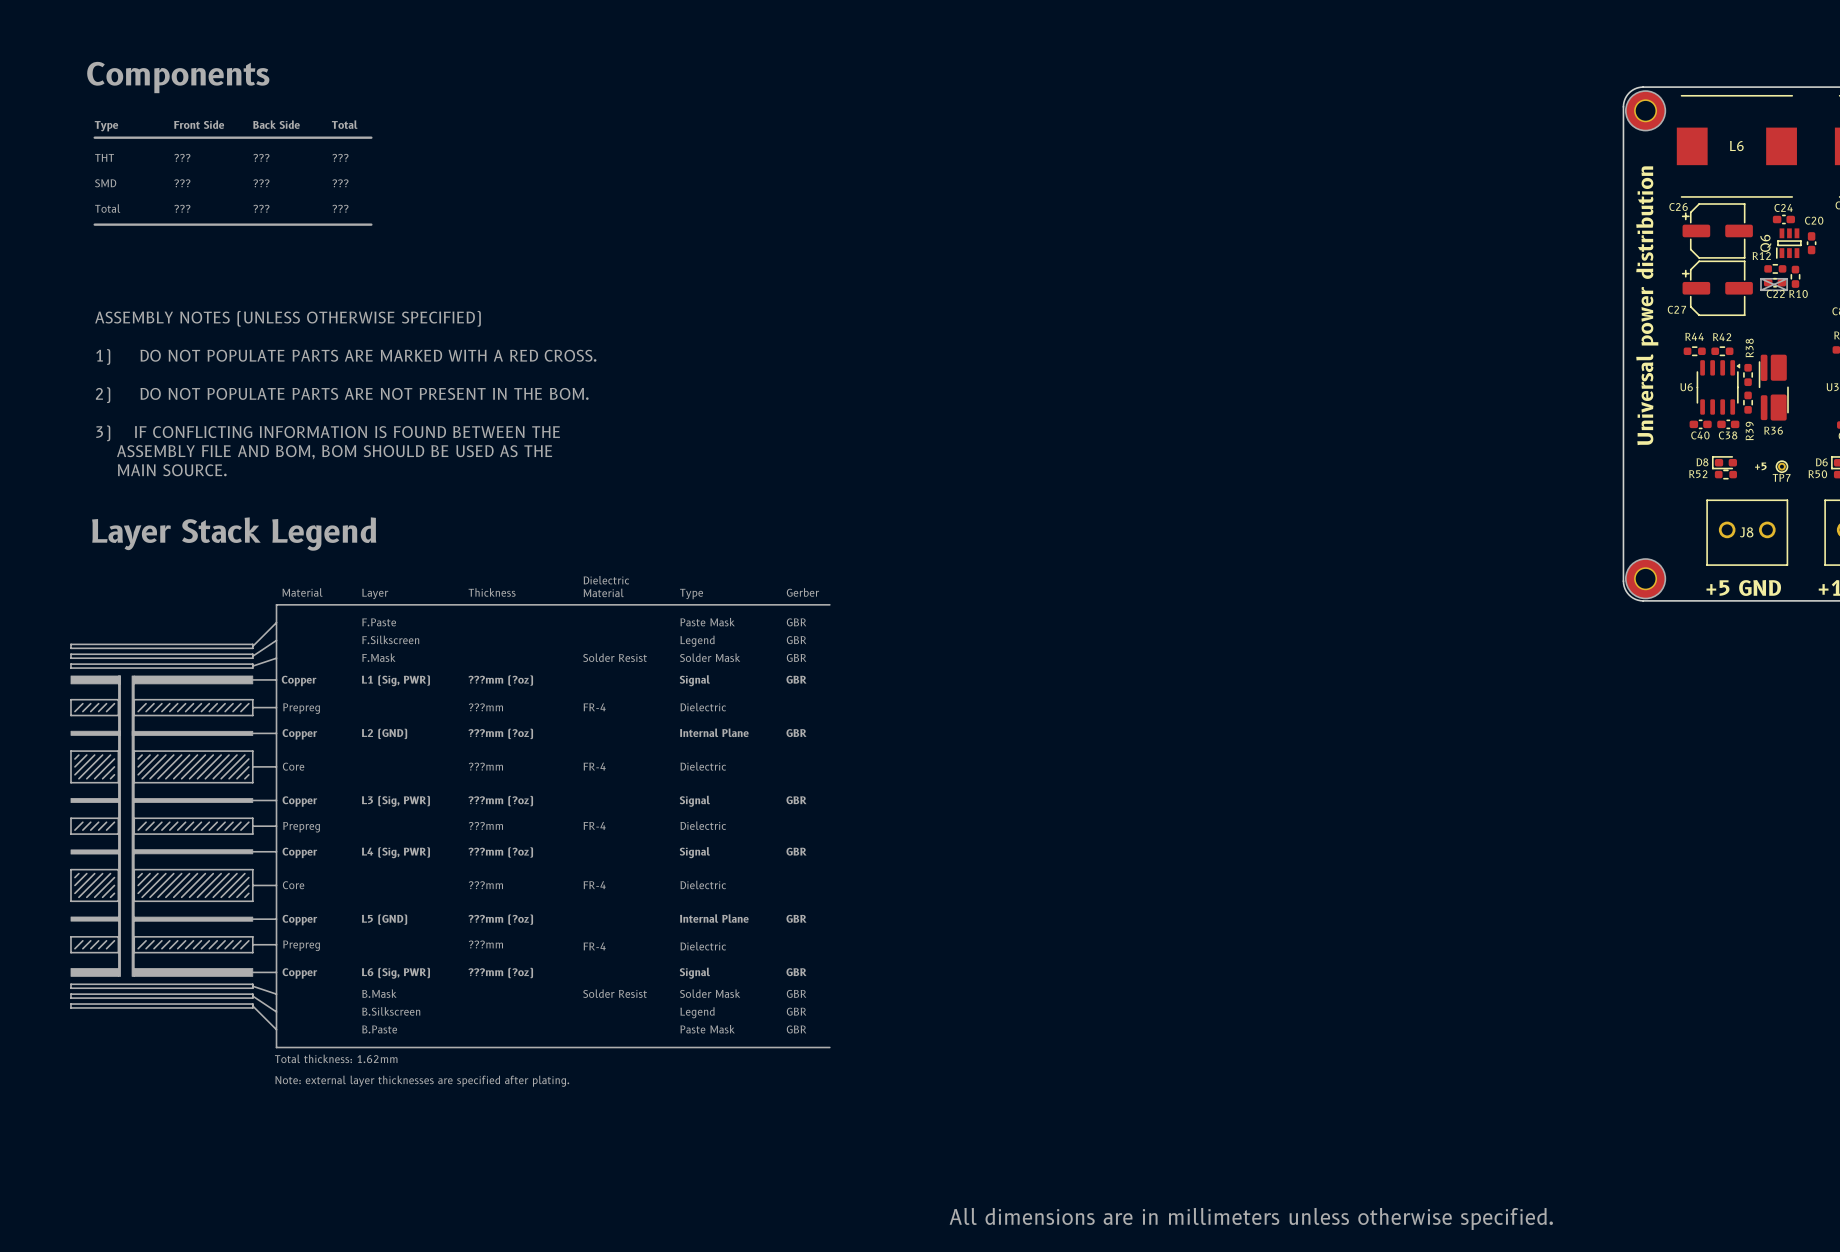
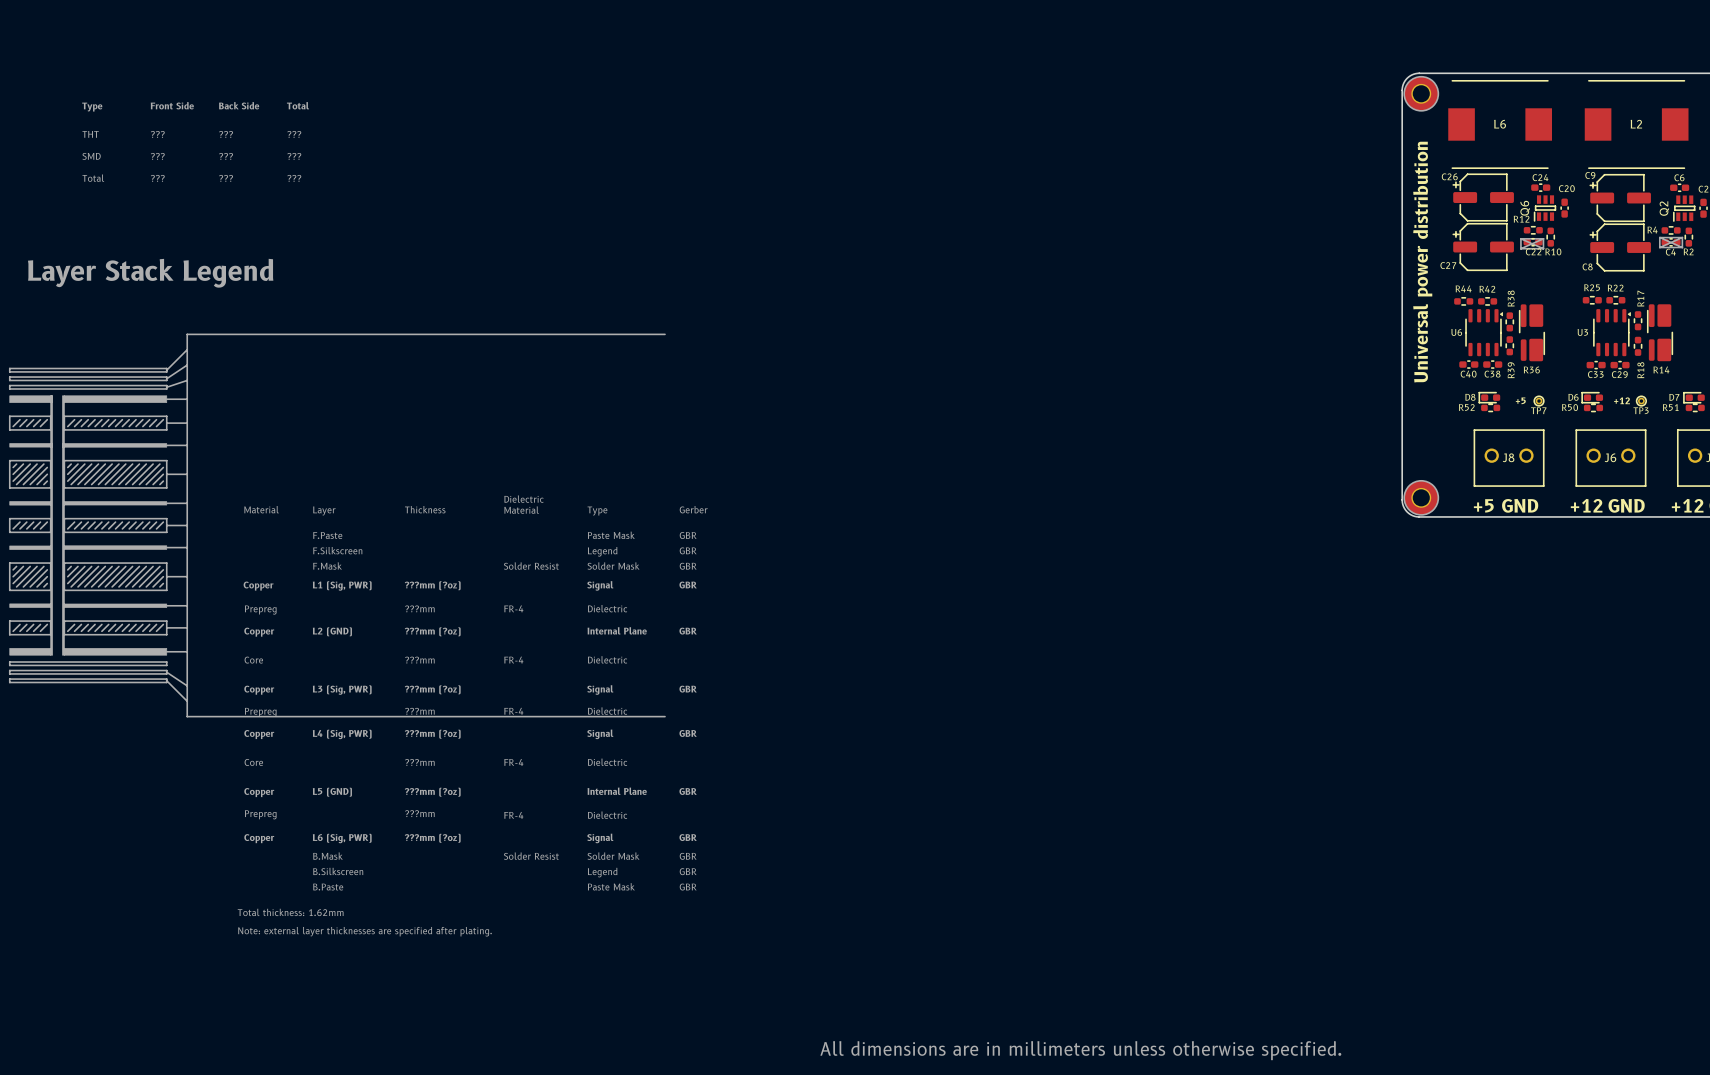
text: Components (178, 77) -> none
line: (94, 137) (371, 137) -> none
line: (94, 224) (371, 224) -> none
text: none -> Layer Stack Legend (150, 273)
text: ASSEMBLY NOTES (UNLESS OTHERWISE SPECIFIED) (288, 318) -> none
text: 1) DO NOT POPULATE PARTS ARE MARKED WITH A RED CROSS. (346, 356) -> none
line: none -> (665, 334) (187, 334) (187, 716) (665, 716)
text: 2) DO NOT POPULATE PARTS ARE NOT PRESENT IN THE BOM. (342, 395) -> none
line: none -> (187, 349) (166, 370)
line: none -> (187, 365) (166, 378)
line: none -> (9, 368) (9, 371) (166, 371) (166, 368) (9, 368)
text: 3) IF CONFLICTING INFORMATION IS FOUND BETWEEN THE (328, 433) -> none
line: none -> (9, 377) (9, 380) (166, 380) (166, 377) (9, 377)
line: none -> (187, 380) (166, 387)
line: none -> (9, 385) (9, 388) (166, 388) (166, 385) (9, 385)
text: ASSEMBLY FILE AND BOM, BOM SHOULD BE USED AS THE (334, 452) -> none
drawing: none -> [9, 395, 53, 656]
drawing: none -> [62, 395, 168, 656]
line: none -> (166, 399) (187, 399)
text: MAIN SOURCE. (172, 470) -> none
line: none -> (9, 416) (9, 429) (50, 429) (50, 416) (9, 416)
line: none -> (64, 416) (64, 429) (166, 429) (166, 416) (64, 416)
line: none -> (19, 419) (13, 426)
line: none -> (26, 419) (19, 426)
line: none -> (33, 419) (26, 426)
line: none -> (40, 419) (33, 426)
line: none -> (47, 419) (40, 426)
line: none -> (74, 419) (67, 426)
line: none -> (81, 419) (74, 426)
line: none -> (88, 419) (81, 426)
line: none -> (95, 419) (88, 426)
line: none -> (101, 419) (95, 426)
line: none -> (108, 419) (101, 426)
line: none -> (115, 419) (108, 426)
line: none -> (122, 419) (115, 426)
line: none -> (129, 419) (122, 426)
line: none -> (136, 419) (129, 426)
line: none -> (142, 419) (136, 426)
line: none -> (149, 419) (142, 426)
line: none -> (156, 419) (149, 426)
line: none -> (163, 419) (156, 426)
line: none -> (166, 423) (187, 423)
line: none -> (166, 445) (187, 445)
text: Layer Stack Legend (234, 534) -> none
line: none -> (9, 460) (9, 487) (50, 487) (50, 460) (9, 460)
line: none -> (64, 460) (64, 487) (166, 487) (166, 460) (64, 460)
line: none -> (16, 464) (13, 467)
line: none -> (23, 464) (13, 474)
line: none -> (30, 464) (13, 481)
line: none -> (37, 464) (16, 484)
line: none -> (43, 464) (23, 484)
line: none -> (71, 464) (67, 467)
line: none -> (78, 464) (67, 474)
line: none -> (84, 464) (67, 481)
line: none -> (91, 464) (71, 484)
line: none -> (98, 464) (78, 484)
line: none -> (105, 464) (84, 484)
line: none -> (112, 464) (91, 484)
line: none -> (118, 464) (98, 484)
line: none -> (125, 464) (105, 484)
line: none -> (132, 464) (112, 484)
line: none -> (139, 464) (118, 484)
line: none -> (146, 464) (125, 484)
line: none -> (153, 464) (132, 484)
line: none -> (47, 467) (30, 484)
line: none -> (163, 467) (146, 484)
line: none -> (47, 474) (37, 484)
line: none -> (163, 474) (153, 484)
line: none -> (47, 481) (43, 484)
line: none -> (163, 481) (159, 484)
line: none -> (166, 503) (187, 503)
line: (829, 604) (276, 604) (276, 1047) (829, 1047) -> none
line: (276, 622) (252, 646) -> (159, 464) (139, 484)
line: (276, 640) (252, 656) -> none
line: (70, 644) (70, 648) (252, 648) (252, 644) (70, 644) -> (9, 662) (9, 665) (166, 665) (166, 662) (9, 662)
line: none -> (9, 563) (9, 590) (50, 590) (50, 563) (9, 563)
line: (74, 654) (70, 654) (70, 658) (252, 658) (252, 654) (192, 654) -> (64, 563) (64, 590) (166, 590) (166, 563)
line: (276, 658) (252, 666) -> none
line: (70, 664) (70, 668) (252, 668) (252, 664) (70, 664) -> (9, 679) (9, 682) (166, 682) (166, 679) (9, 679)
drawing: [70, 675, 121, 977] -> none
drawing: [131, 675, 254, 977] -> none
drawing position: (193, 679) -> (115, 651)
line: (252, 679) (276, 679) -> (166, 474) (187, 474)
line: (70, 699) (70, 715) (118, 715) (118, 699) (70, 699) -> (9, 518) (9, 532) (50, 532) (50, 518) (9, 518)
line: (134, 699) (134, 715) (252, 715) (252, 699) (134, 699) -> (64, 518) (64, 532) (166, 532) (166, 518) (64, 518)
line: (82, 703) (74, 711) -> (19, 522) (13, 528)
line: (90, 703) (82, 711) -> (26, 522) (19, 528)
line: (98, 703) (90, 711) -> (33, 522) (26, 528)
line: (106, 703) (98, 711) -> (40, 522) (33, 528)
line: (114, 703) (106, 711) -> (47, 522) (40, 528)
line: (146, 703) (138, 711) -> (74, 522) (67, 528)
line: (153, 703) (146, 711) -> (81, 522) (74, 528)
line: (161, 703) (153, 711) -> (88, 522) (81, 528)
line: (169, 703) (161, 711) -> (95, 522) (88, 528)
line: (177, 703) (169, 711) -> (101, 522) (95, 528)
line: (185, 703) (177, 711) -> (108, 522) (101, 528)
line: (193, 703) (185, 711) -> (115, 522) (108, 528)
line: (201, 703) (193, 711) -> (122, 522) (115, 528)
line: (209, 703) (201, 711) -> (129, 522) (122, 528)
line: (217, 703) (209, 711) -> (136, 522) (129, 528)
line: (225, 703) (217, 711) -> (142, 522) (136, 528)
line: (233, 703) (225, 711) -> (149, 522) (142, 528)
line: (240, 703) (233, 711) -> (156, 522) (149, 528)
line: (248, 703) (240, 711) -> (163, 522) (156, 528)
line: (252, 707) (276, 707) -> (166, 525) (187, 525)
line: (252, 733) (276, 733) -> (166, 605) (187, 605)
line: (78, 755) (74, 758) -> (16, 566) (13, 569)
line: (86, 755) (74, 766) -> (23, 566) (13, 576)
line: (94, 755) (74, 774) -> (30, 566) (13, 583)
line: (102, 755) (78, 778) -> (37, 566) (16, 586)
line: (110, 755) (86, 778) -> (43, 566) (23, 586)
line: (142, 755) (138, 758) -> (71, 566) (67, 569)
line: (150, 755) (138, 766) -> (78, 566) (67, 576)
line: (157, 755) (138, 774) -> (84, 566) (67, 583)
line: (165, 755) (142, 778) -> (91, 566) (71, 586)
line: (173, 755) (150, 778) -> (98, 566) (78, 586)
line: (181, 755) (157, 778) -> (105, 566) (84, 586)
line: (189, 755) (165, 778) -> (112, 566) (91, 586)
line: (197, 755) (173, 778) -> (118, 566) (98, 586)
line: (205, 755) (181, 778) -> (125, 566) (105, 586)
line: (213, 755) (189, 778) -> (132, 566) (112, 586)
line: (221, 755) (197, 778) -> (139, 566) (118, 586)
line: (229, 755) (205, 778) -> (146, 566) (125, 586)
line: (236, 755) (213, 778) -> (153, 566) (132, 586)
line: (244, 755) (221, 778) -> (159, 566) (139, 586)
line: (114, 758) (94, 778) -> (47, 569) (30, 586)
line: (248, 758) (229, 778) -> (163, 569) (146, 586)
line: (114, 766) (102, 778) -> (47, 576) (37, 586)
line: (248, 766) (236, 778) -> (163, 576) (153, 586)
line: (252, 766) (276, 766) -> (166, 576) (187, 576)
line: (114, 774) (110, 778) -> (47, 583) (43, 586)
line: (248, 774) (244, 778) -> (163, 583) (159, 586)
line: none -> (166, 672) (187, 685)
line: (70, 782) (70, 751) (118, 751) (118, 782) -> (116, 673) (102, 673)
line: (134, 782) (134, 751) (252, 751) (252, 782) (192, 782) -> (61, 673) (9, 673) (9, 670) (166, 670) (166, 673)
line: none -> (166, 680) (187, 701)
line: (252, 800) (276, 800) -> (166, 547) (187, 547)
line: (70, 818) (70, 834) (118, 834) (118, 818) (70, 818) -> (9, 621) (9, 634) (50, 634) (50, 621) (9, 621)
line: (134, 818) (134, 834) (252, 834) (252, 818) (134, 818) -> (64, 621) (64, 634) (166, 634) (166, 621) (64, 621)
line: (82, 822) (74, 830) -> (19, 624) (13, 631)
line: (90, 822) (82, 830) -> (26, 624) (19, 631)
line: (98, 822) (90, 830) -> (33, 624) (26, 631)
line: (106, 822) (98, 830) -> (40, 624) (33, 631)
line: (114, 822) (106, 830) -> (47, 624) (40, 631)
line: (146, 822) (138, 830) -> (74, 624) (67, 631)
line: (153, 822) (146, 830) -> (81, 624) (74, 631)
line: (161, 822) (153, 830) -> (88, 624) (81, 631)
line: (169, 822) (161, 830) -> (95, 624) (88, 631)
line: (177, 822) (169, 830) -> (101, 624) (95, 631)
line: (185, 822) (177, 830) -> (108, 624) (101, 631)
line: (193, 822) (185, 830) -> (115, 624) (108, 631)
line: (201, 822) (193, 830) -> (122, 624) (115, 631)
line: (209, 822) (201, 830) -> (129, 624) (122, 631)
line: (217, 822) (209, 830) -> (136, 624) (129, 631)
line: (225, 822) (217, 830) -> (142, 624) (136, 631)
line: (233, 822) (225, 830) -> (149, 624) (142, 631)
line: (240, 822) (233, 830) -> (156, 624) (149, 631)
line: (248, 822) (240, 830) -> (163, 624) (156, 631)
line: (252, 826) (276, 826) -> (166, 627) (187, 627)
line: (252, 851) (276, 851) -> none
line: (70, 869) (70, 901) (118, 901) (118, 869) (70, 869) -> none
line: (134, 869) (134, 901) (252, 901) (252, 869) (134, 869) -> none
line: (78, 873) (74, 877) -> none
line: (86, 873) (74, 885) -> none
line: (94, 873) (74, 893) -> none
line: (102, 873) (78, 897) -> none
line: (110, 873) (86, 897) -> none
line: (142, 873) (138, 877) -> none
line: (150, 873) (138, 885) -> none
line: (157, 873) (138, 893) -> none
line: (165, 873) (142, 897) -> none
line: (173, 873) (150, 897) -> none
line: (181, 873) (157, 897) -> none
line: (189, 873) (165, 897) -> none
line: (197, 873) (173, 897) -> none
line: (205, 873) (181, 897) -> none
line: (213, 873) (189, 897) -> none
line: (221, 873) (197, 897) -> none
line: (229, 873) (205, 897) -> none
line: (236, 873) (213, 897) -> none
line: (244, 873) (221, 897) -> none
line: (114, 877) (94, 897) -> none
line: (248, 877) (229, 897) -> none
line: (114, 885) (102, 897) -> none
line: (248, 885) (236, 897) -> none
line: (252, 885) (276, 885) -> (166, 651) (187, 651)
line: (114, 893) (110, 897) -> none
line: (248, 893) (244, 897) -> none
line: (252, 919) (276, 919) -> none
line: (70, 936) (118, 936) (118, 952) (70, 952) (70, 936) -> none
line: (134, 936) (252, 936) (252, 952) (134, 952) (134, 936) -> none
line: (82, 940) (74, 948) -> none
line: (90, 940) (82, 948) -> none
line: (98, 940) (90, 948) -> none
line: (106, 940) (98, 948) -> none
line: (114, 940) (106, 948) -> none
line: (146, 940) (138, 948) -> none
line: (153, 940) (146, 948) -> none
line: (161, 940) (153, 948) -> none
line: (169, 940) (161, 948) -> none
line: (177, 940) (169, 948) -> none
line: (185, 940) (177, 948) -> none
line: (193, 940) (185, 948) -> none
line: (201, 940) (193, 948) -> none
line: (209, 940) (201, 948) -> none
line: (217, 940) (209, 948) -> none
line: (225, 940) (217, 948) -> none
line: (233, 940) (225, 948) -> none
line: (240, 940) (233, 948) -> none
line: (248, 940) (240, 948) -> none
line: (252, 944) (276, 944) -> none
line: (252, 972) (276, 972) -> none
line: (70, 984) (252, 984) (252, 988) (70, 988) (70, 984) -> none
line: (252, 986) (276, 994) -> none
line: (70, 994) (70, 998) (252, 998) (252, 994) (70, 994) -> none
line: (252, 996) (276, 1011) -> none
line: (70, 1004) (70, 1007) (252, 1007) (252, 1004) (70, 1004) -> none
line: (252, 1006) (276, 1029) -> none

